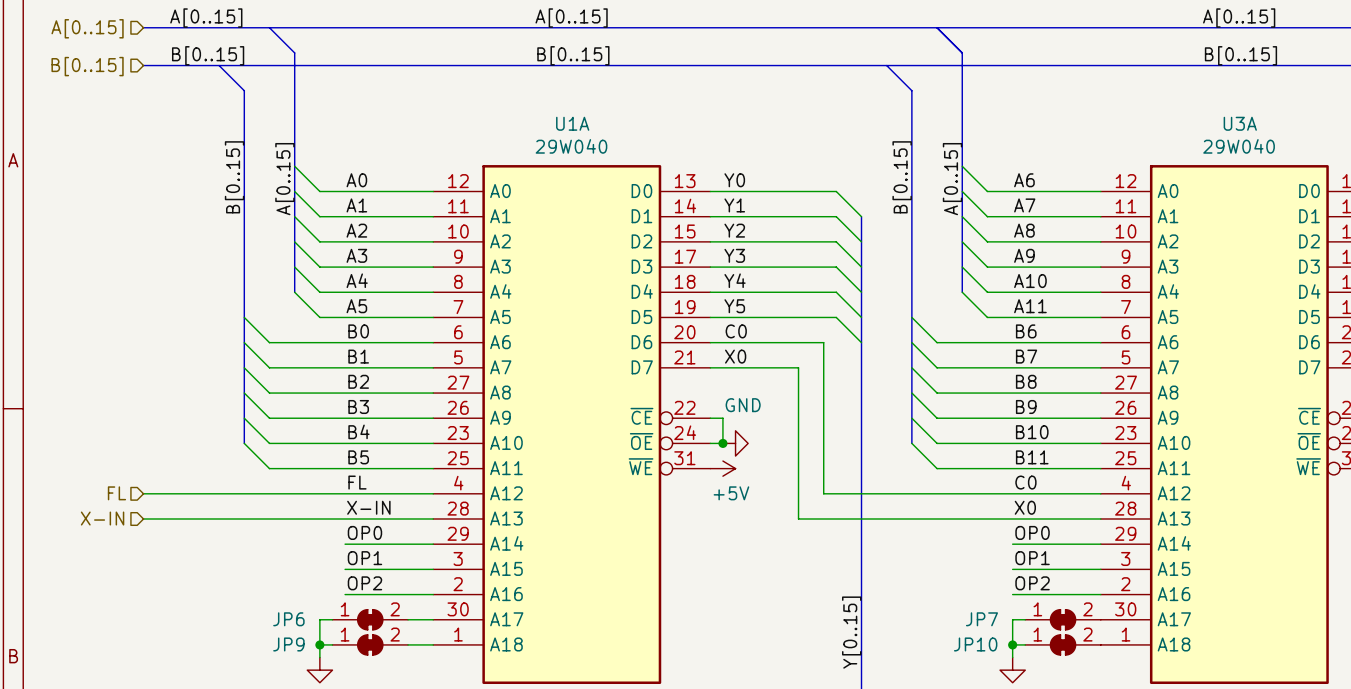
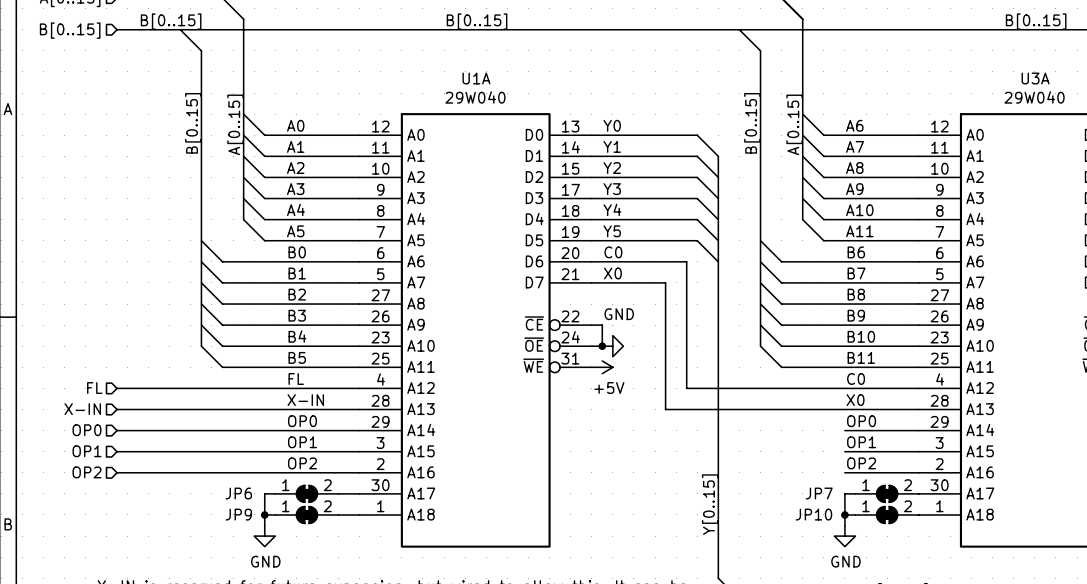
hierarchical label: none -> OP0 (87, 430)
wire: none -> (117, 430) (285, 430)
hierarchical label: none -> OP1 (87, 451)
wire: none -> (117, 451) (285, 451)
hierarchical label: none -> OP2 (87, 472)
wire: none -> (117, 472) (285, 472)

